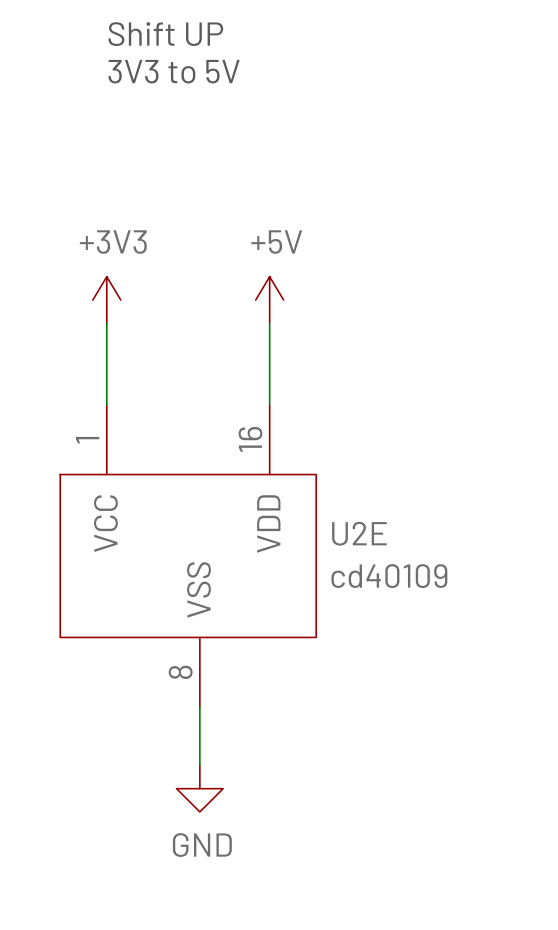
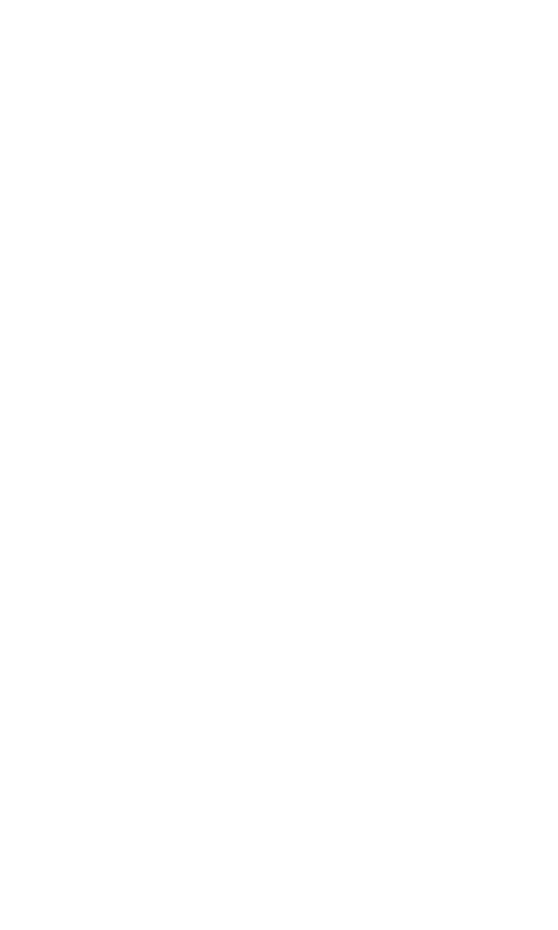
text: Shift UP (165, 34) -> none
text: 3V3 to 5V (174, 71) -> none
power symbol: +3V3 (106, 300) -> none
power symbol: +5V (269, 300) -> none
wire: (106, 323) (106, 404) -> none
wire: (269, 323) (269, 404) -> none
U2E: cd40109 (188, 555) -> none
wire: (199, 707) (199, 765) -> none
power symbol: GND (199, 788) -> none

